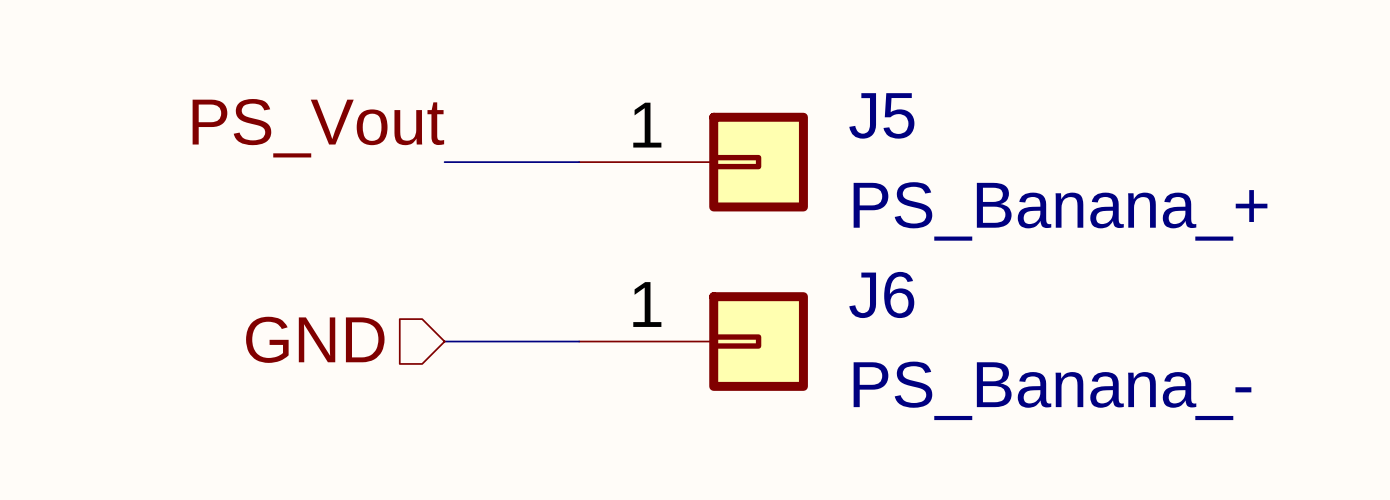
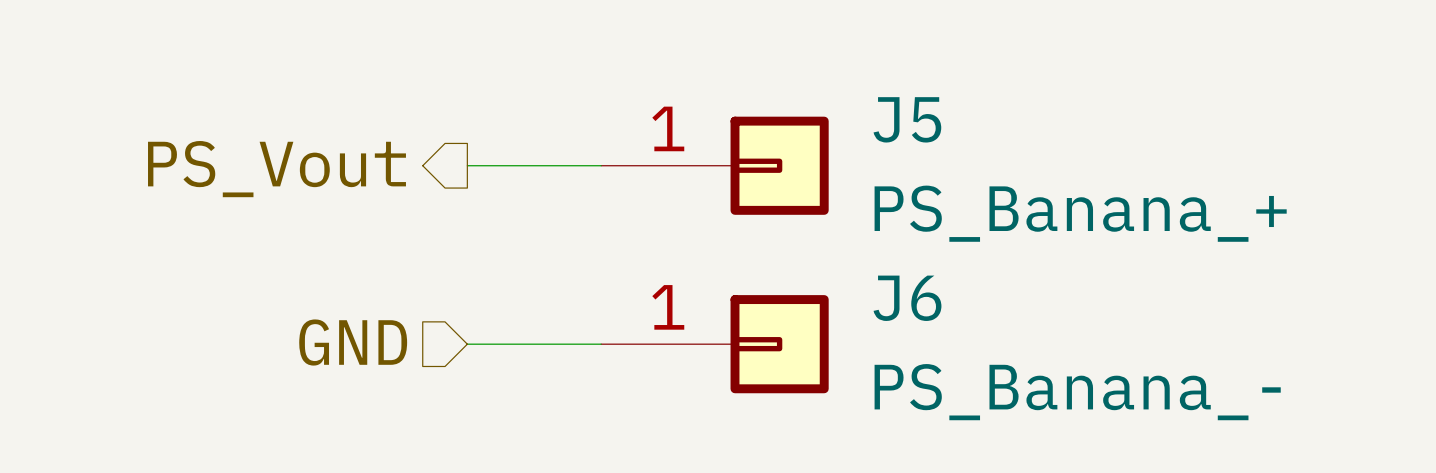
label: PS_Vout (318, 128) -> none
hierarchical label: none -> PS_Vout (276, 169)

